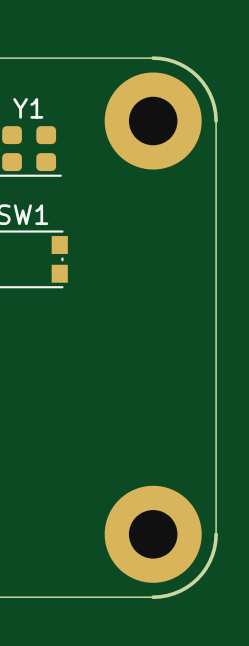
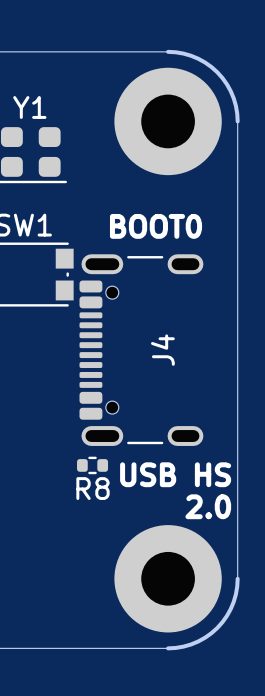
text: none -> BOOT0 (156, 226)
J4: none -> (141, 350)
R8: none -> (92, 465)
text: none -> USB HS (175, 474)
text: none -> 2.0 (208, 506)

